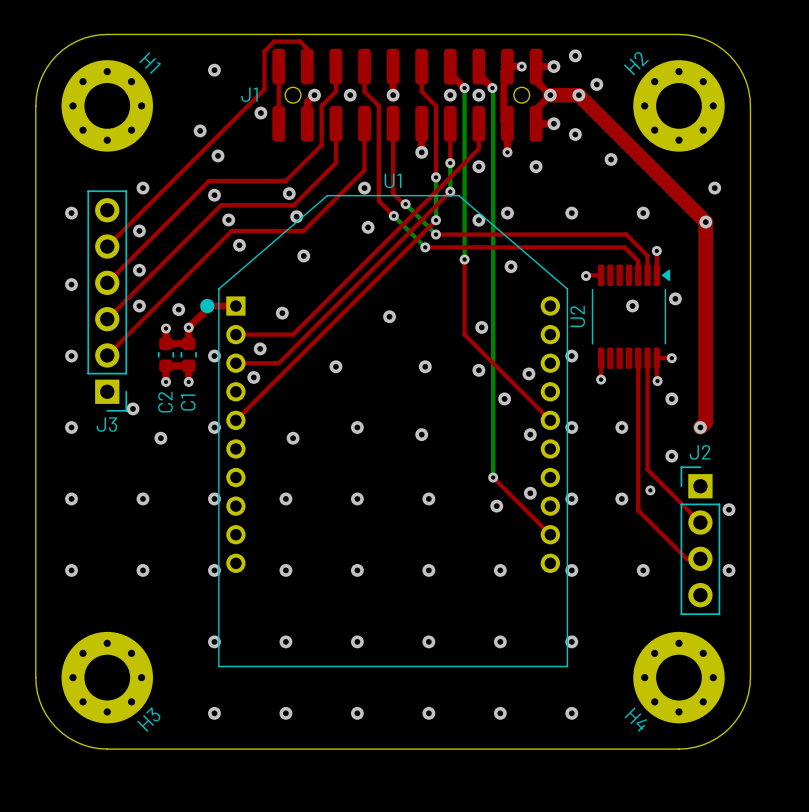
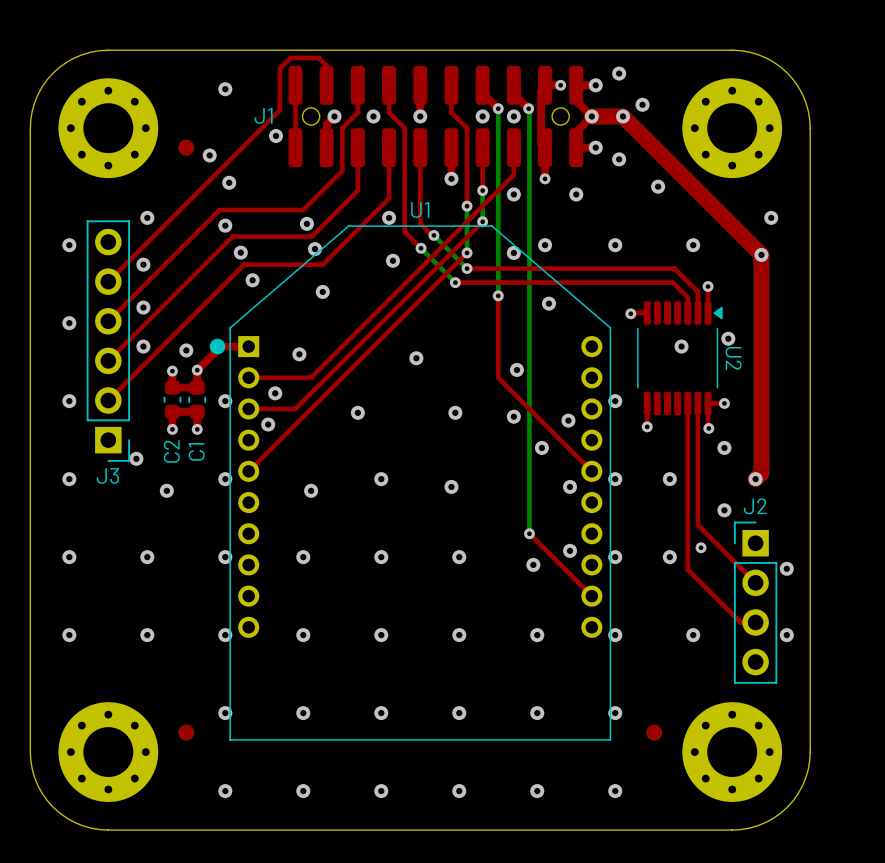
H1 name: H1 (150, 63) -> none
H2 name: H2 (636, 63) -> none
part: none -> (186, 147)
U2 name rotation: 0° (577, 316) -> 180° (733, 358)
U2 name position: U2 (577, 316) -> U2 (733, 358)
part: none -> (186, 732)
part: none -> (654, 732)
H3 name: H3 (148, 719) -> none
H4 name: H4 (635, 719) -> none

